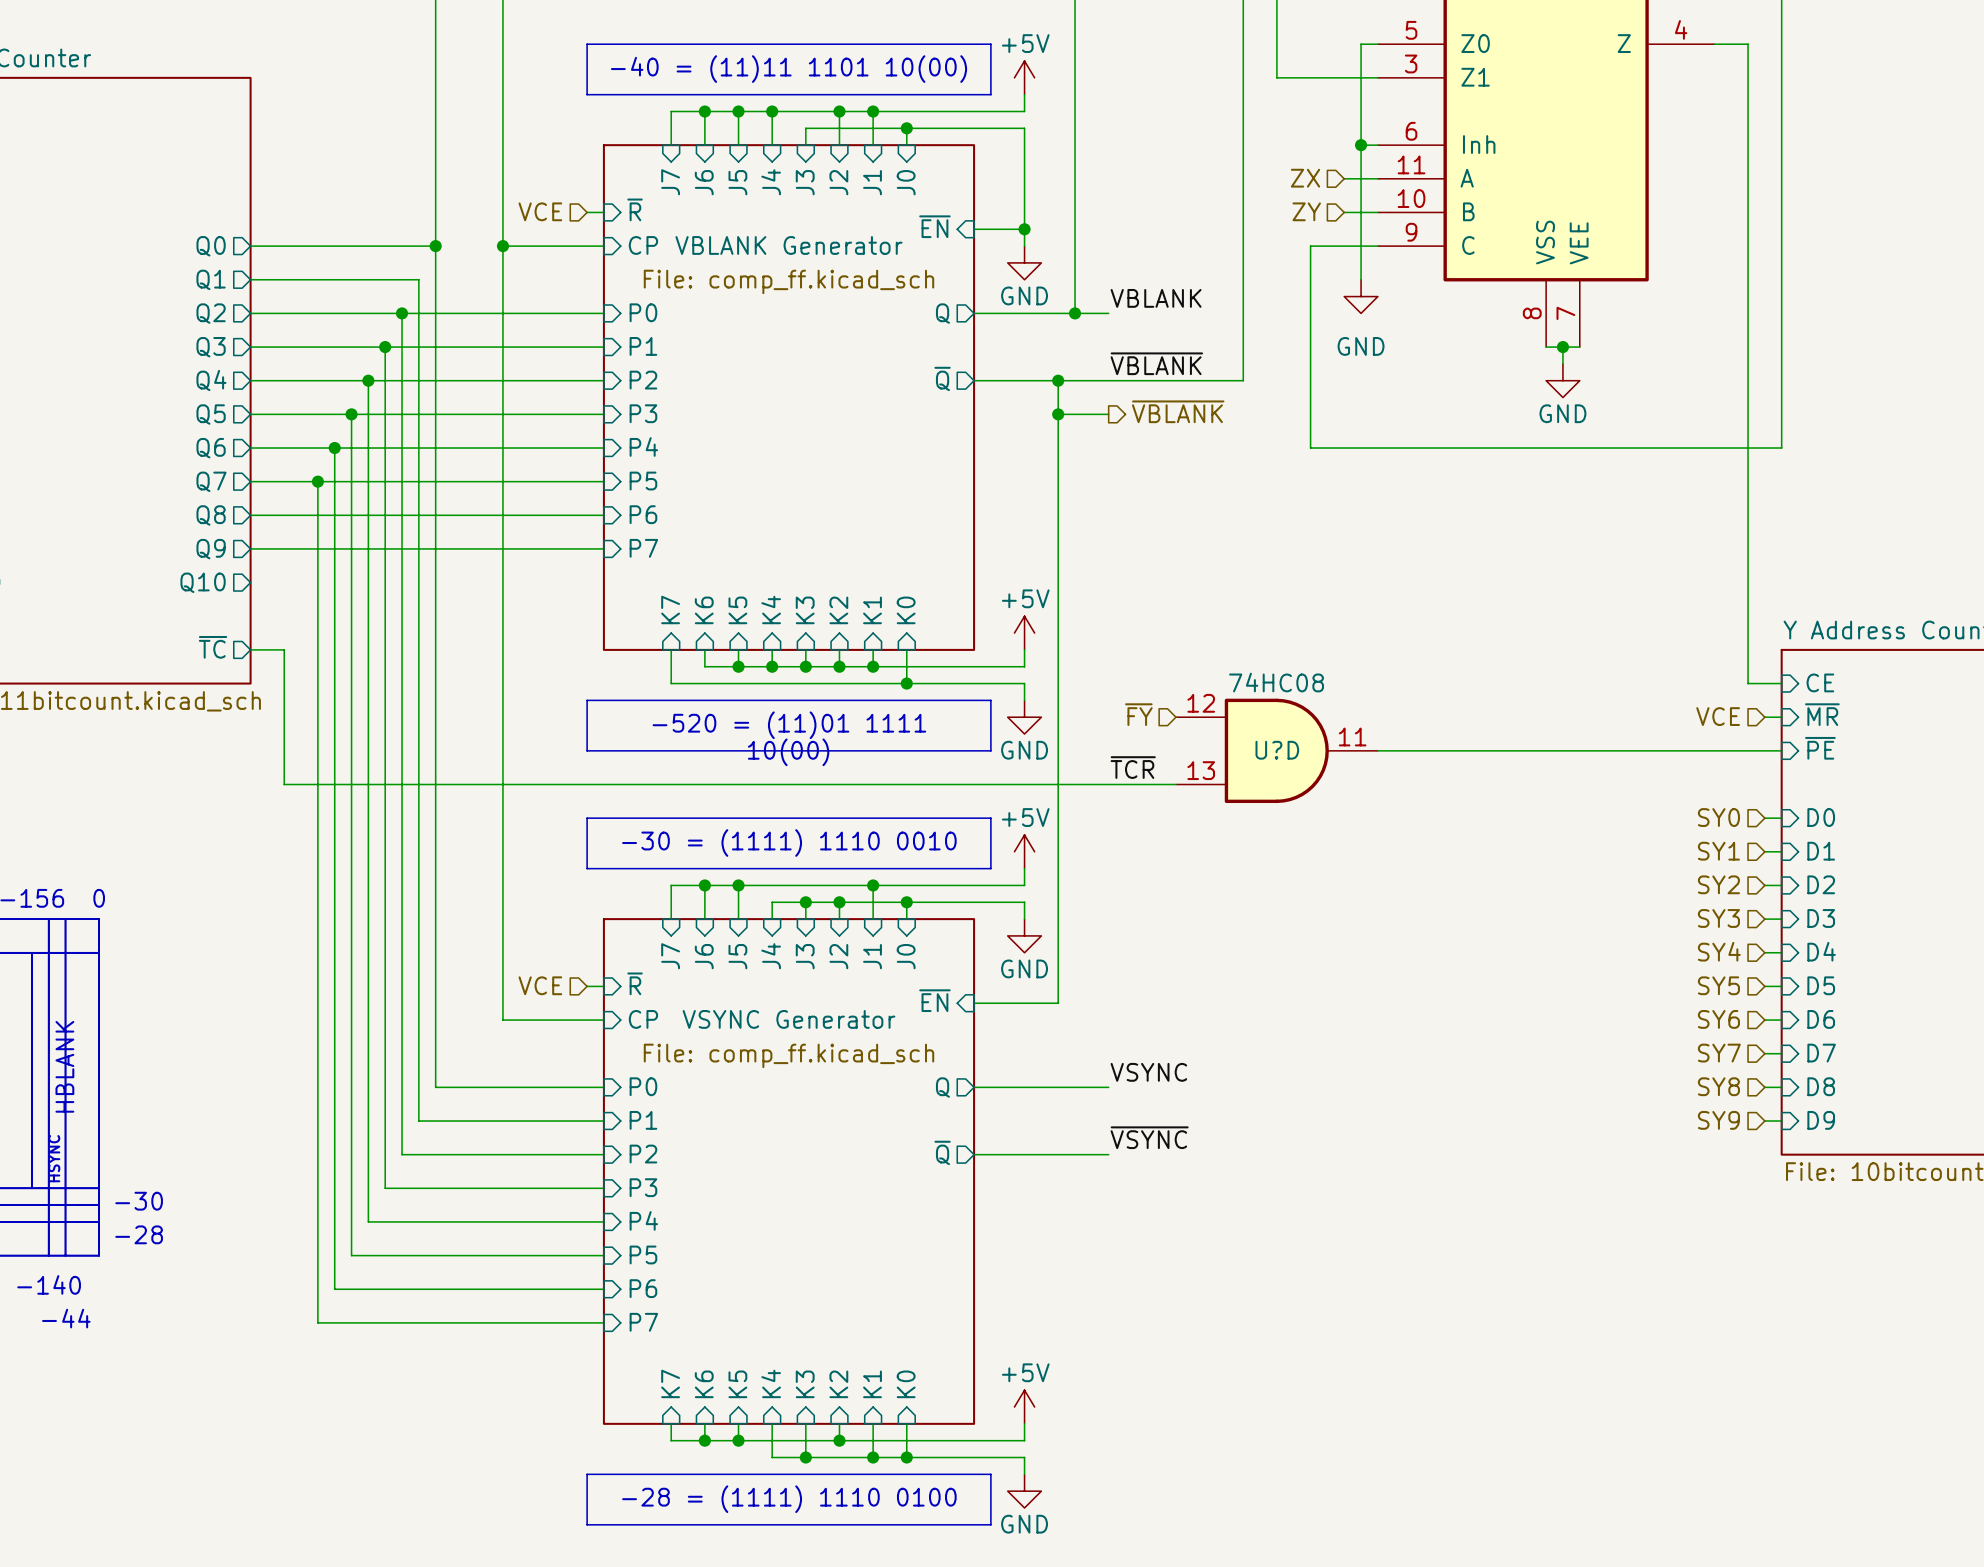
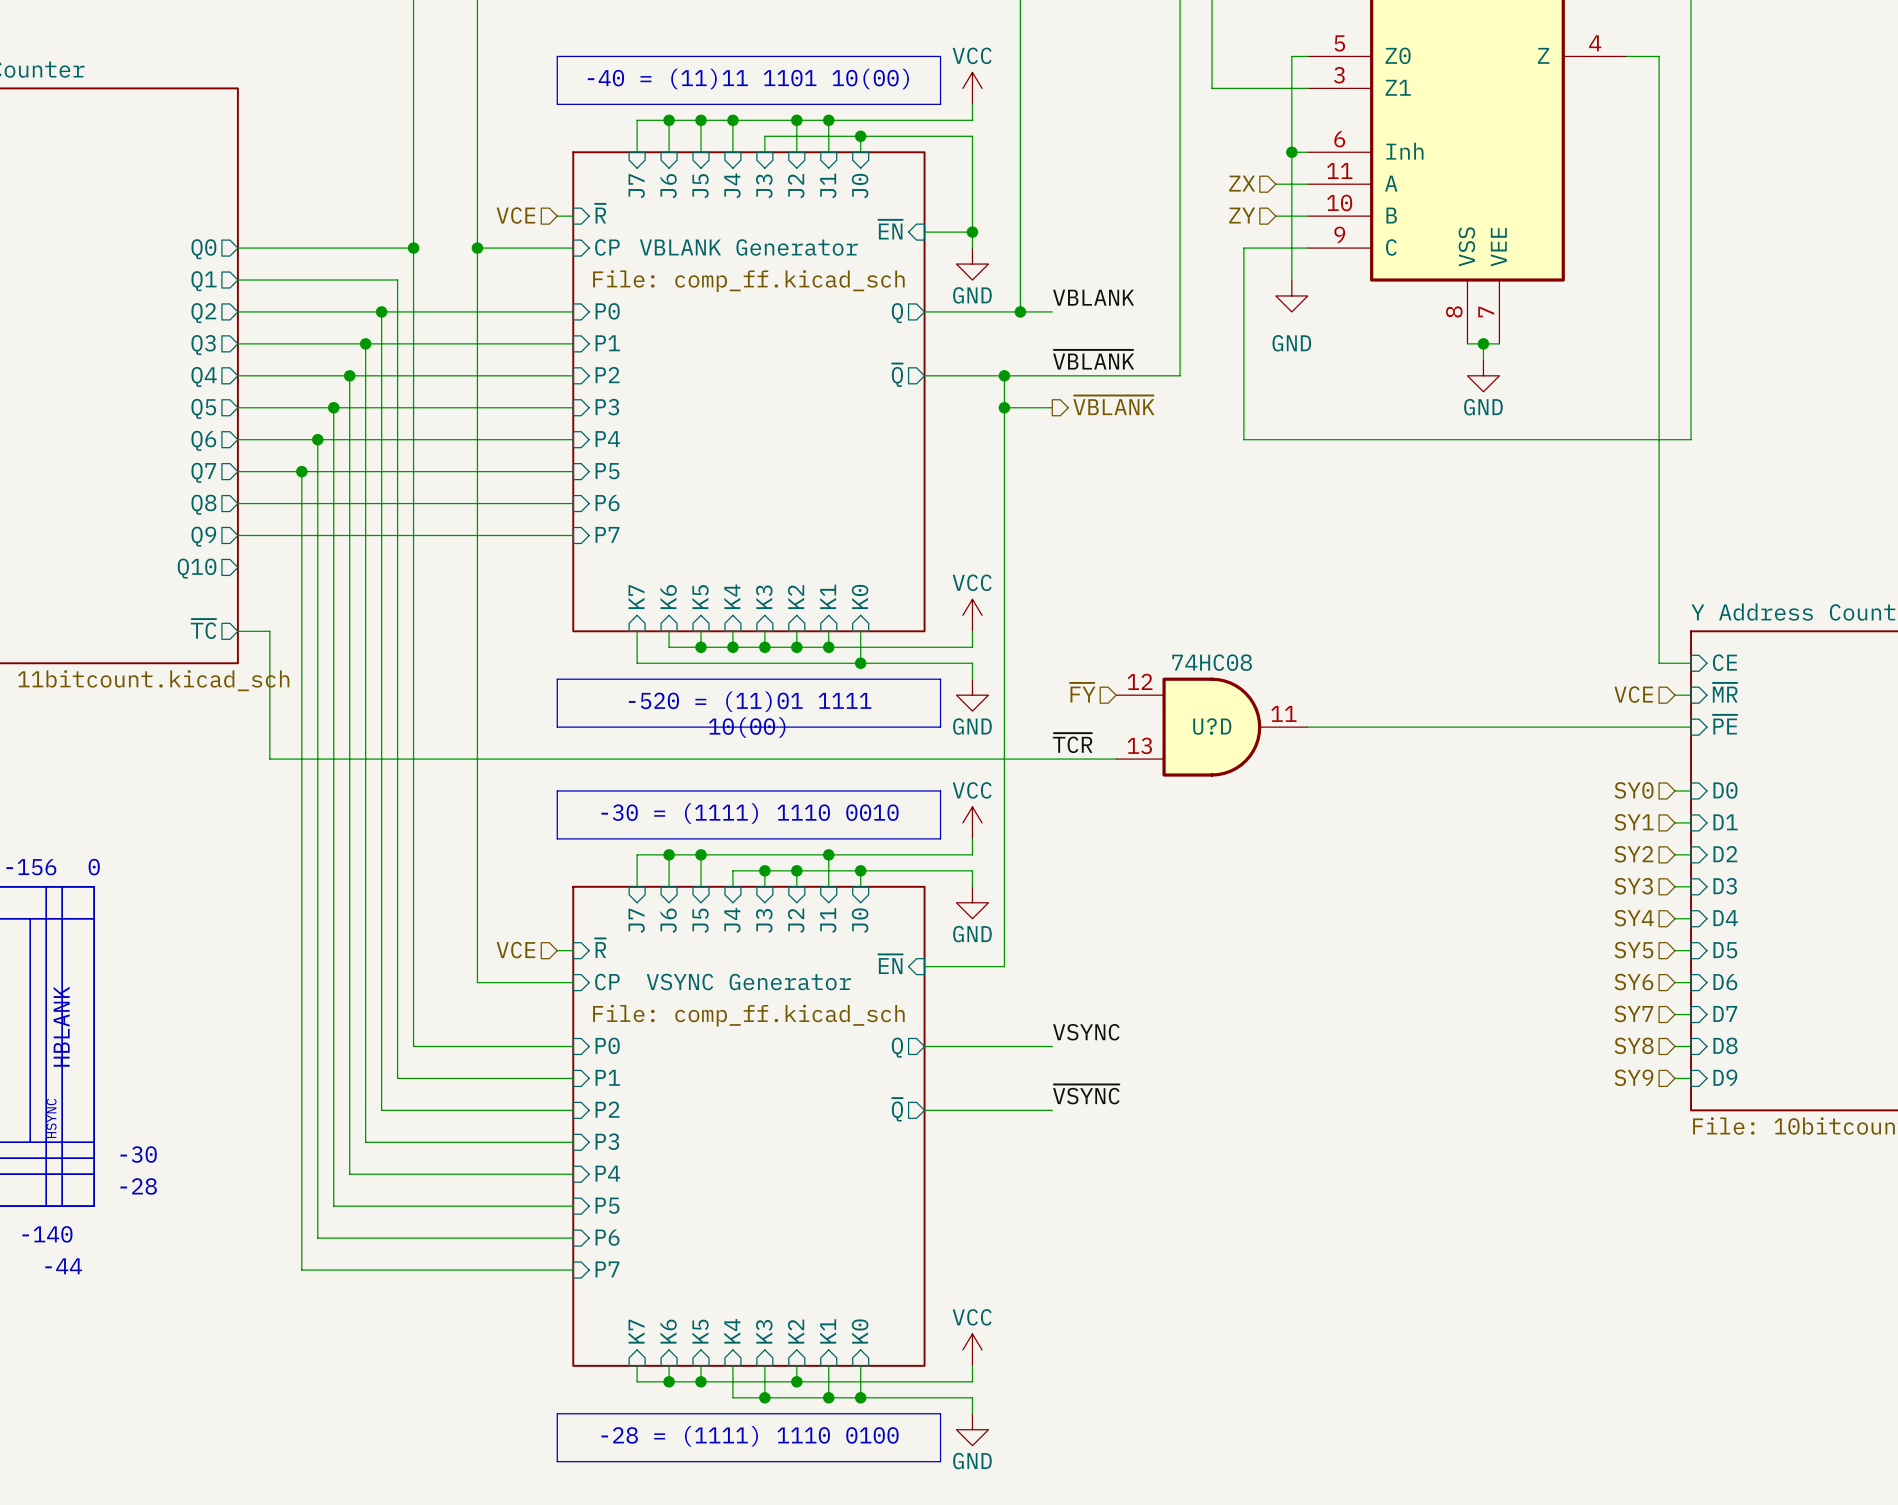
power symbol: +5V (1024, 77) -> VCC (972, 88)
power symbol: +5V (1024, 633) -> VCC (972, 615)
power symbol: +5V (1024, 851) -> VCC (972, 822)
power symbol: +5V (1024, 1407) -> VCC (972, 1349)

